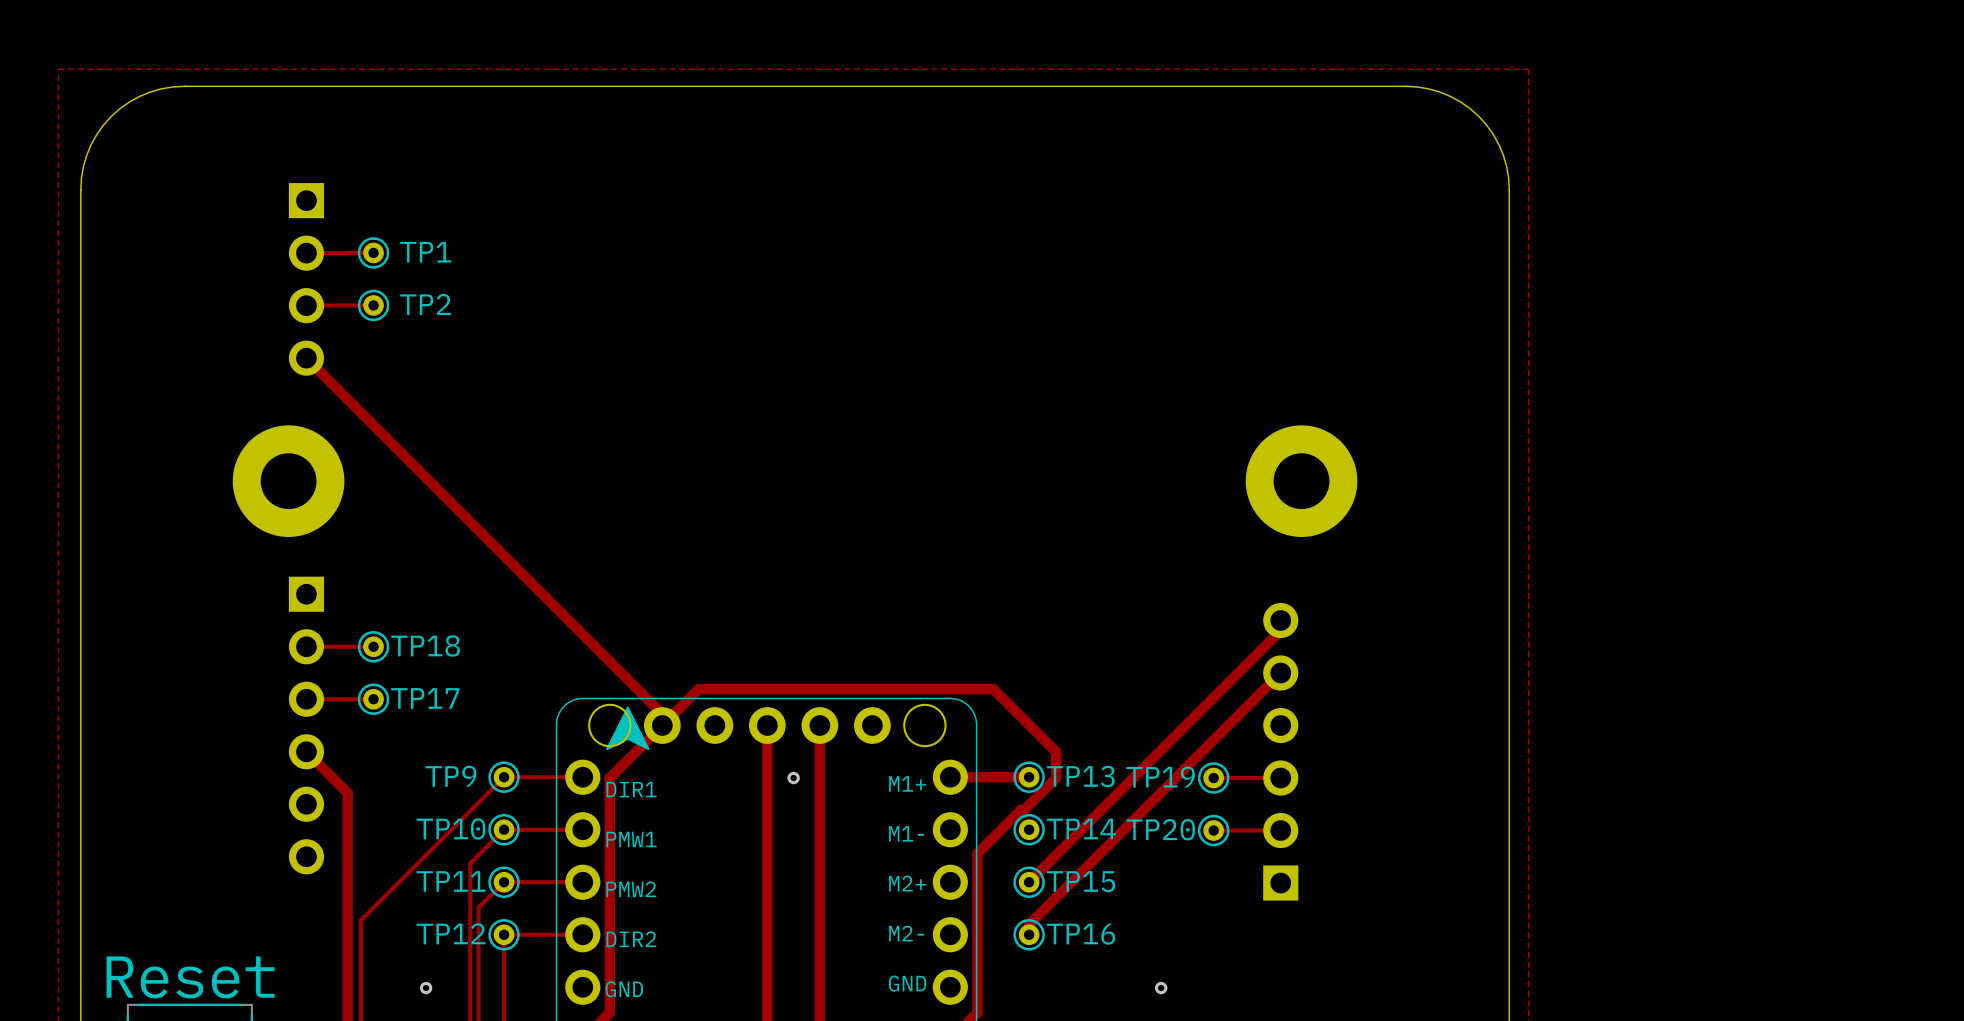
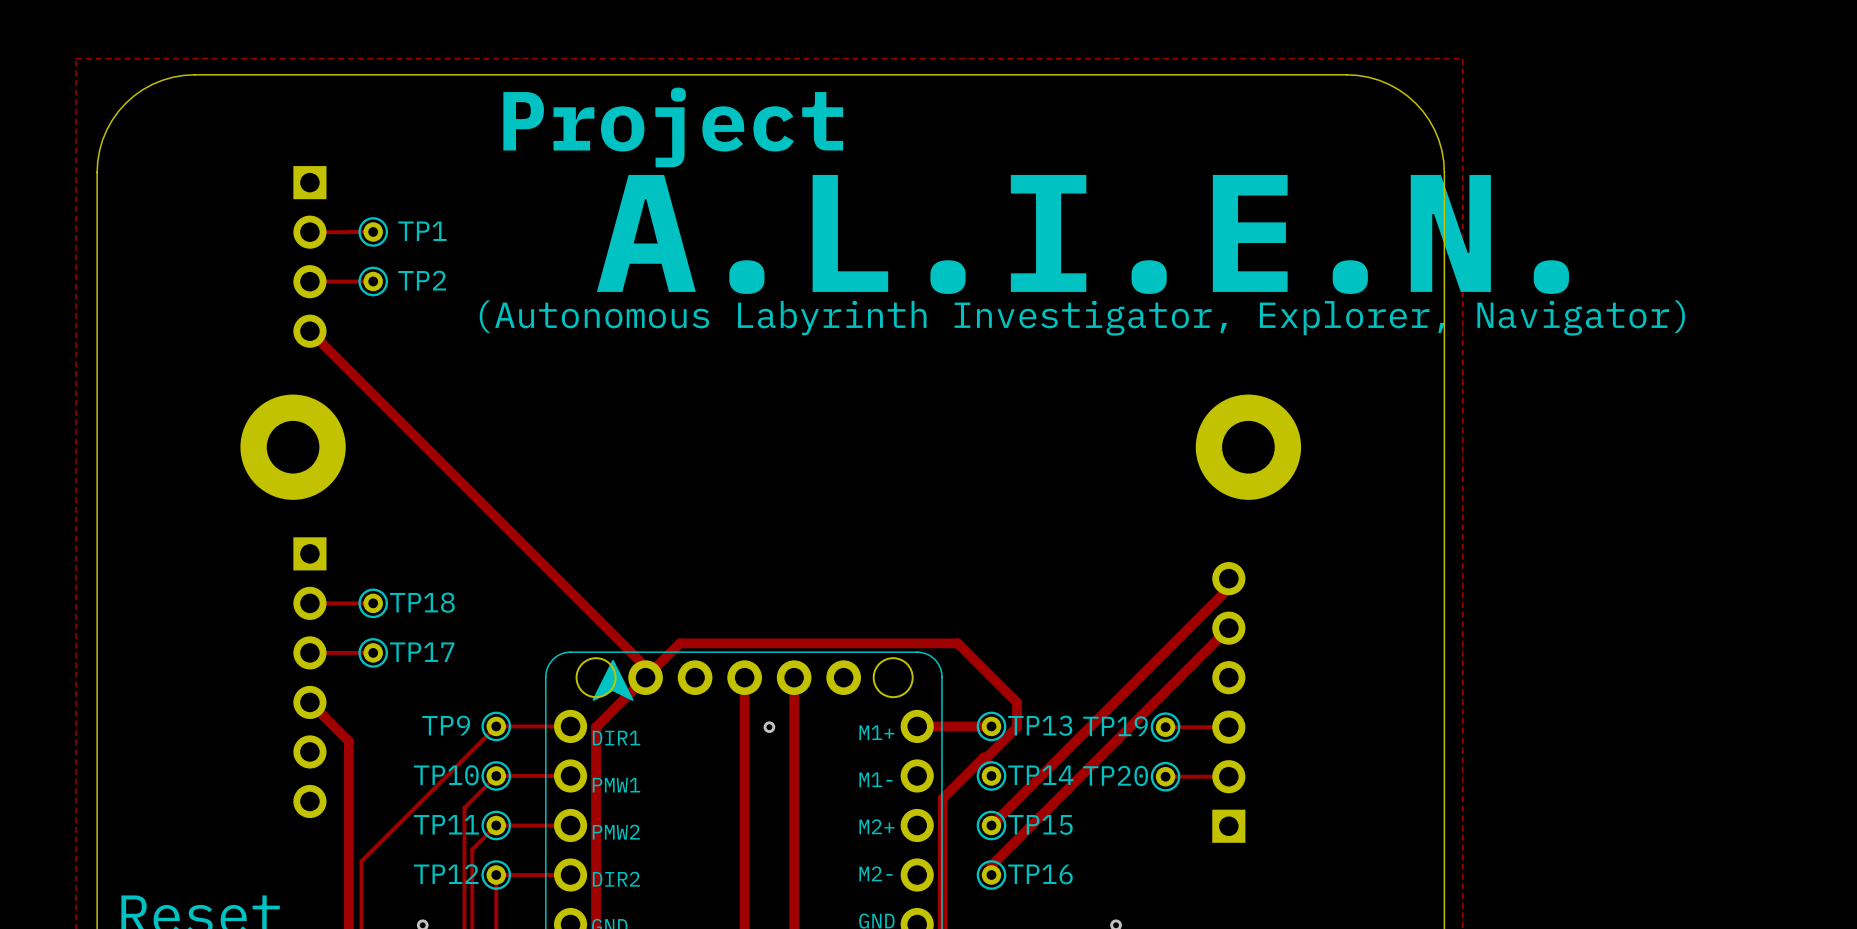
text: none -> Project (673, 127)
text: none -> A.L.I.E.N. (1082, 234)
text: none -> (Autonomous Labyrinth Investigator, Explorer, Navigator) (1082, 317)

